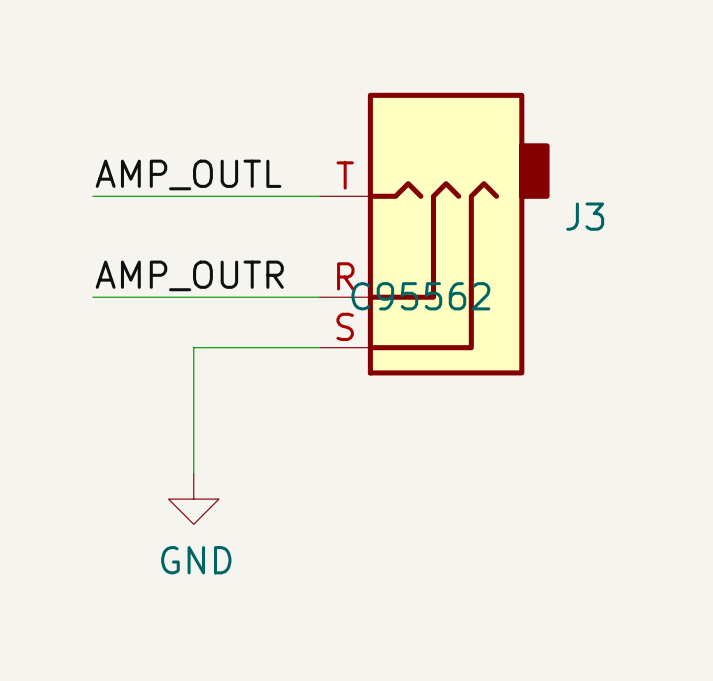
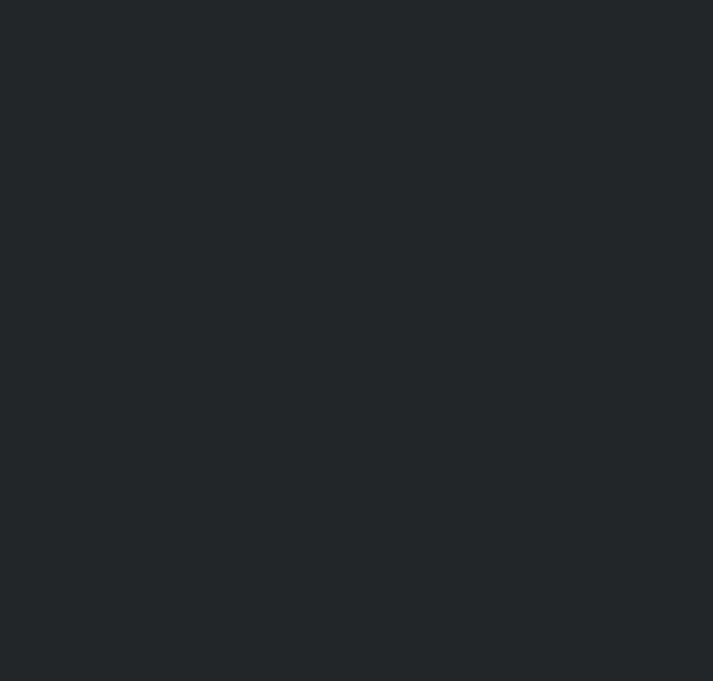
label: AMP_OUTL (188, 174) -> none
wire: (92, 196) (319, 196) -> none
J3: (434, 234) -> none
label: AMP_OUTR (189, 275) -> none
wire: (92, 297) (319, 297) -> none
wire: (319, 347) (193, 347) (193, 473) -> none
power symbol: GND (193, 499) -> none

